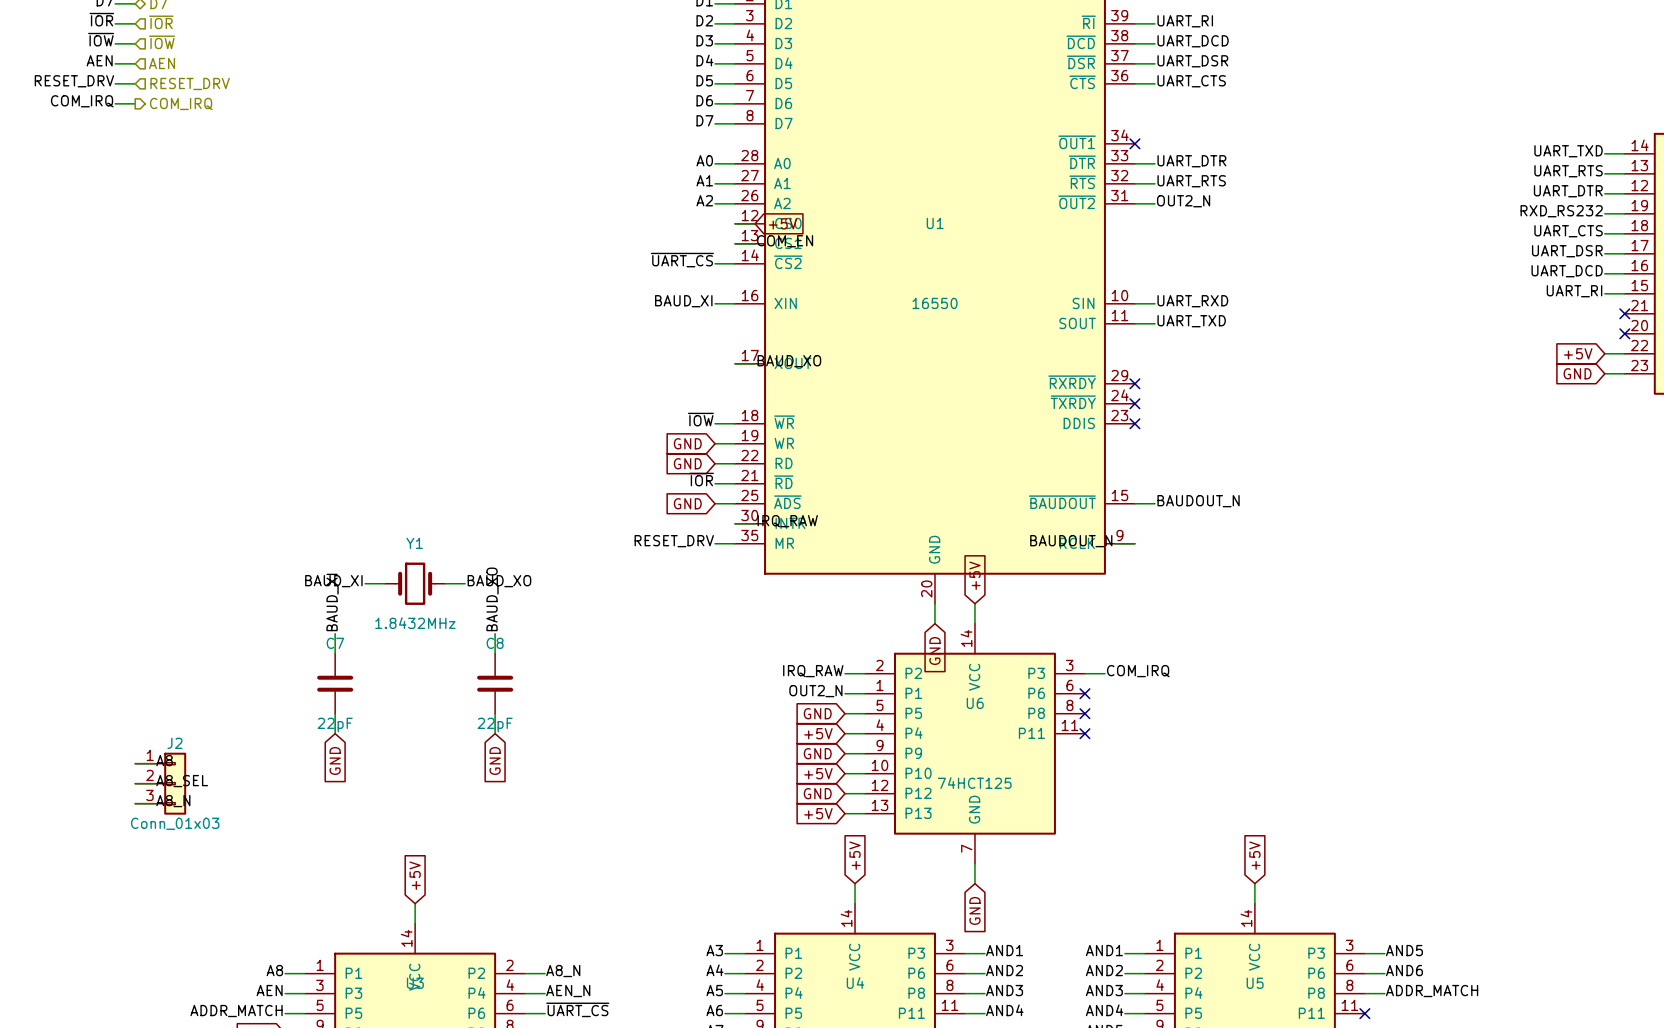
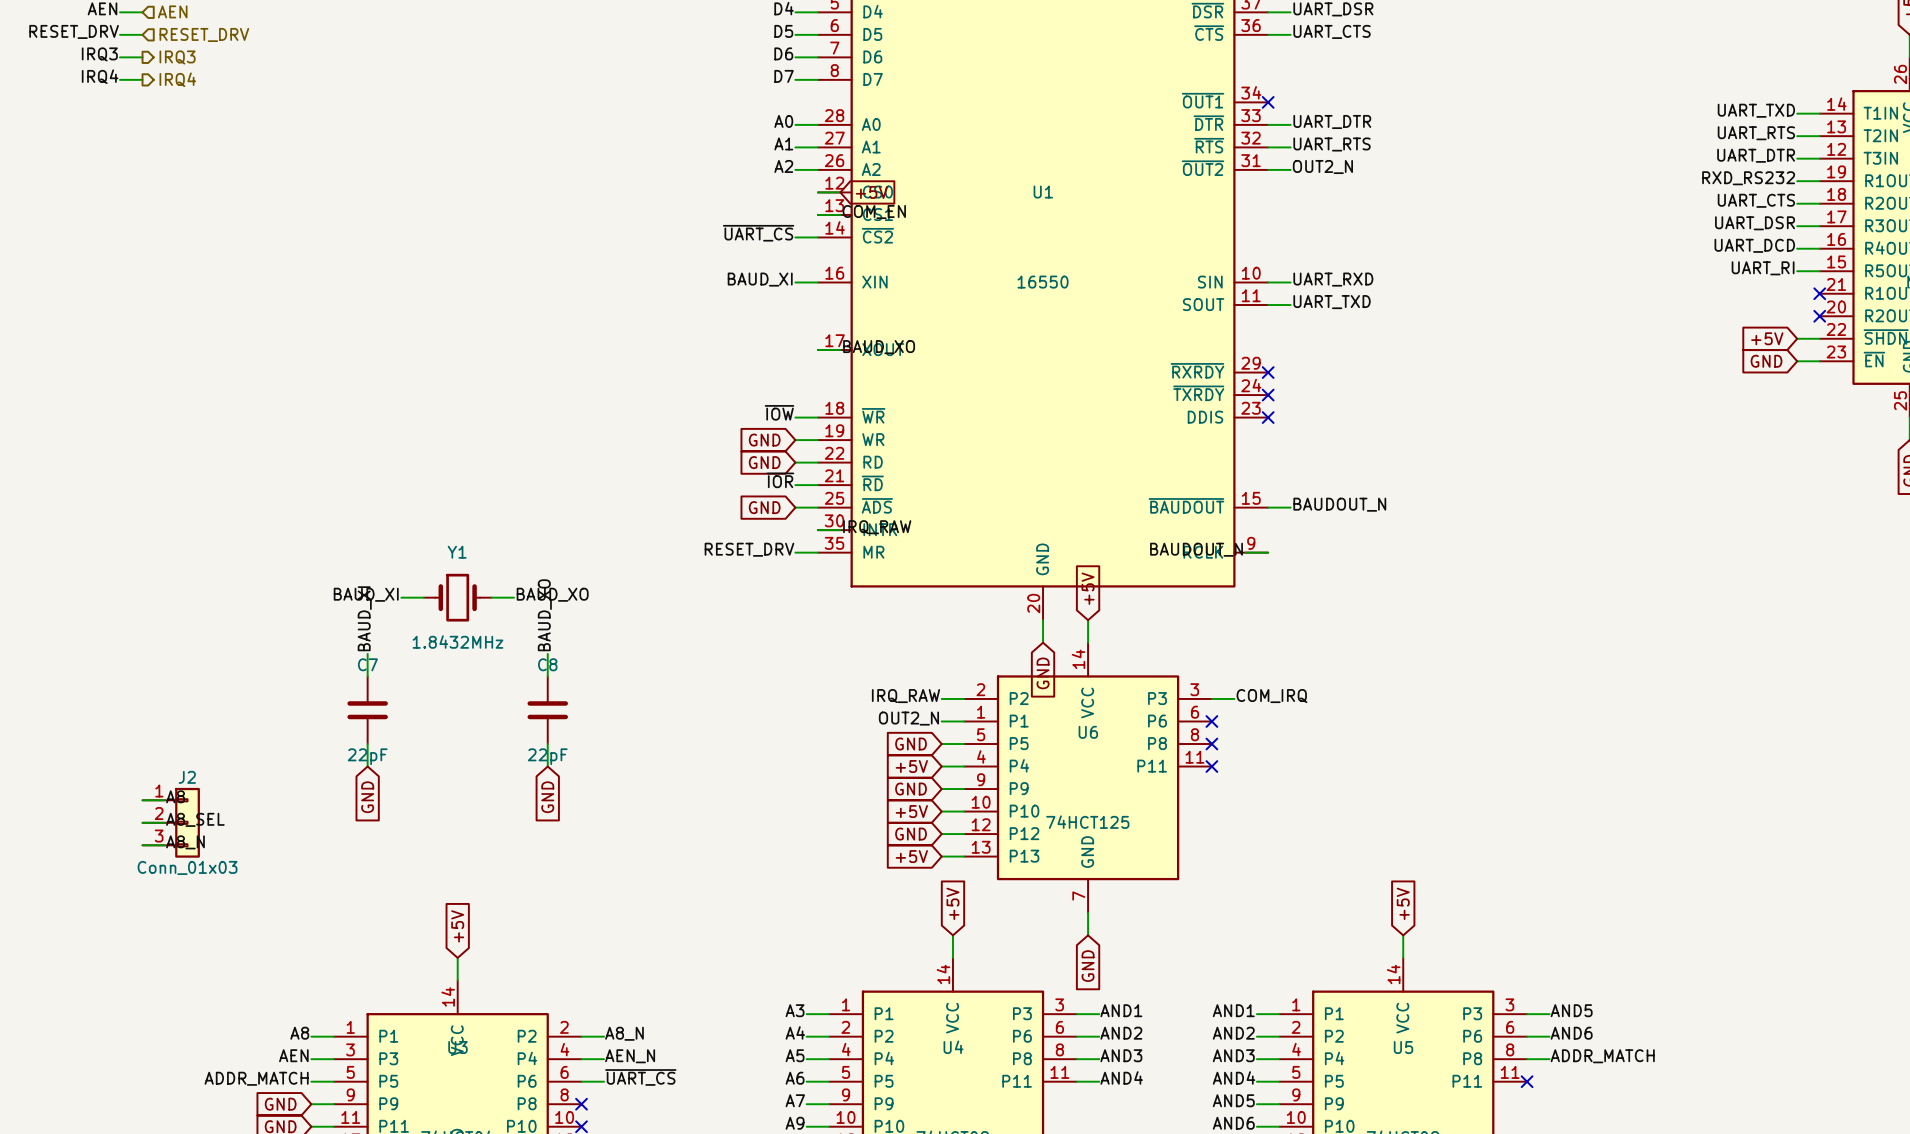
label: COM_IRQ (82, 101) -> IRQ3 (99, 54)
hierarchical label: COM_IRQ (181, 103) -> IRQ3 (177, 57)
label: none -> IRQ4 (100, 76)
wire: none -> (120, 79) (142, 79)
hierarchical label: none -> IRQ4 (177, 79)

